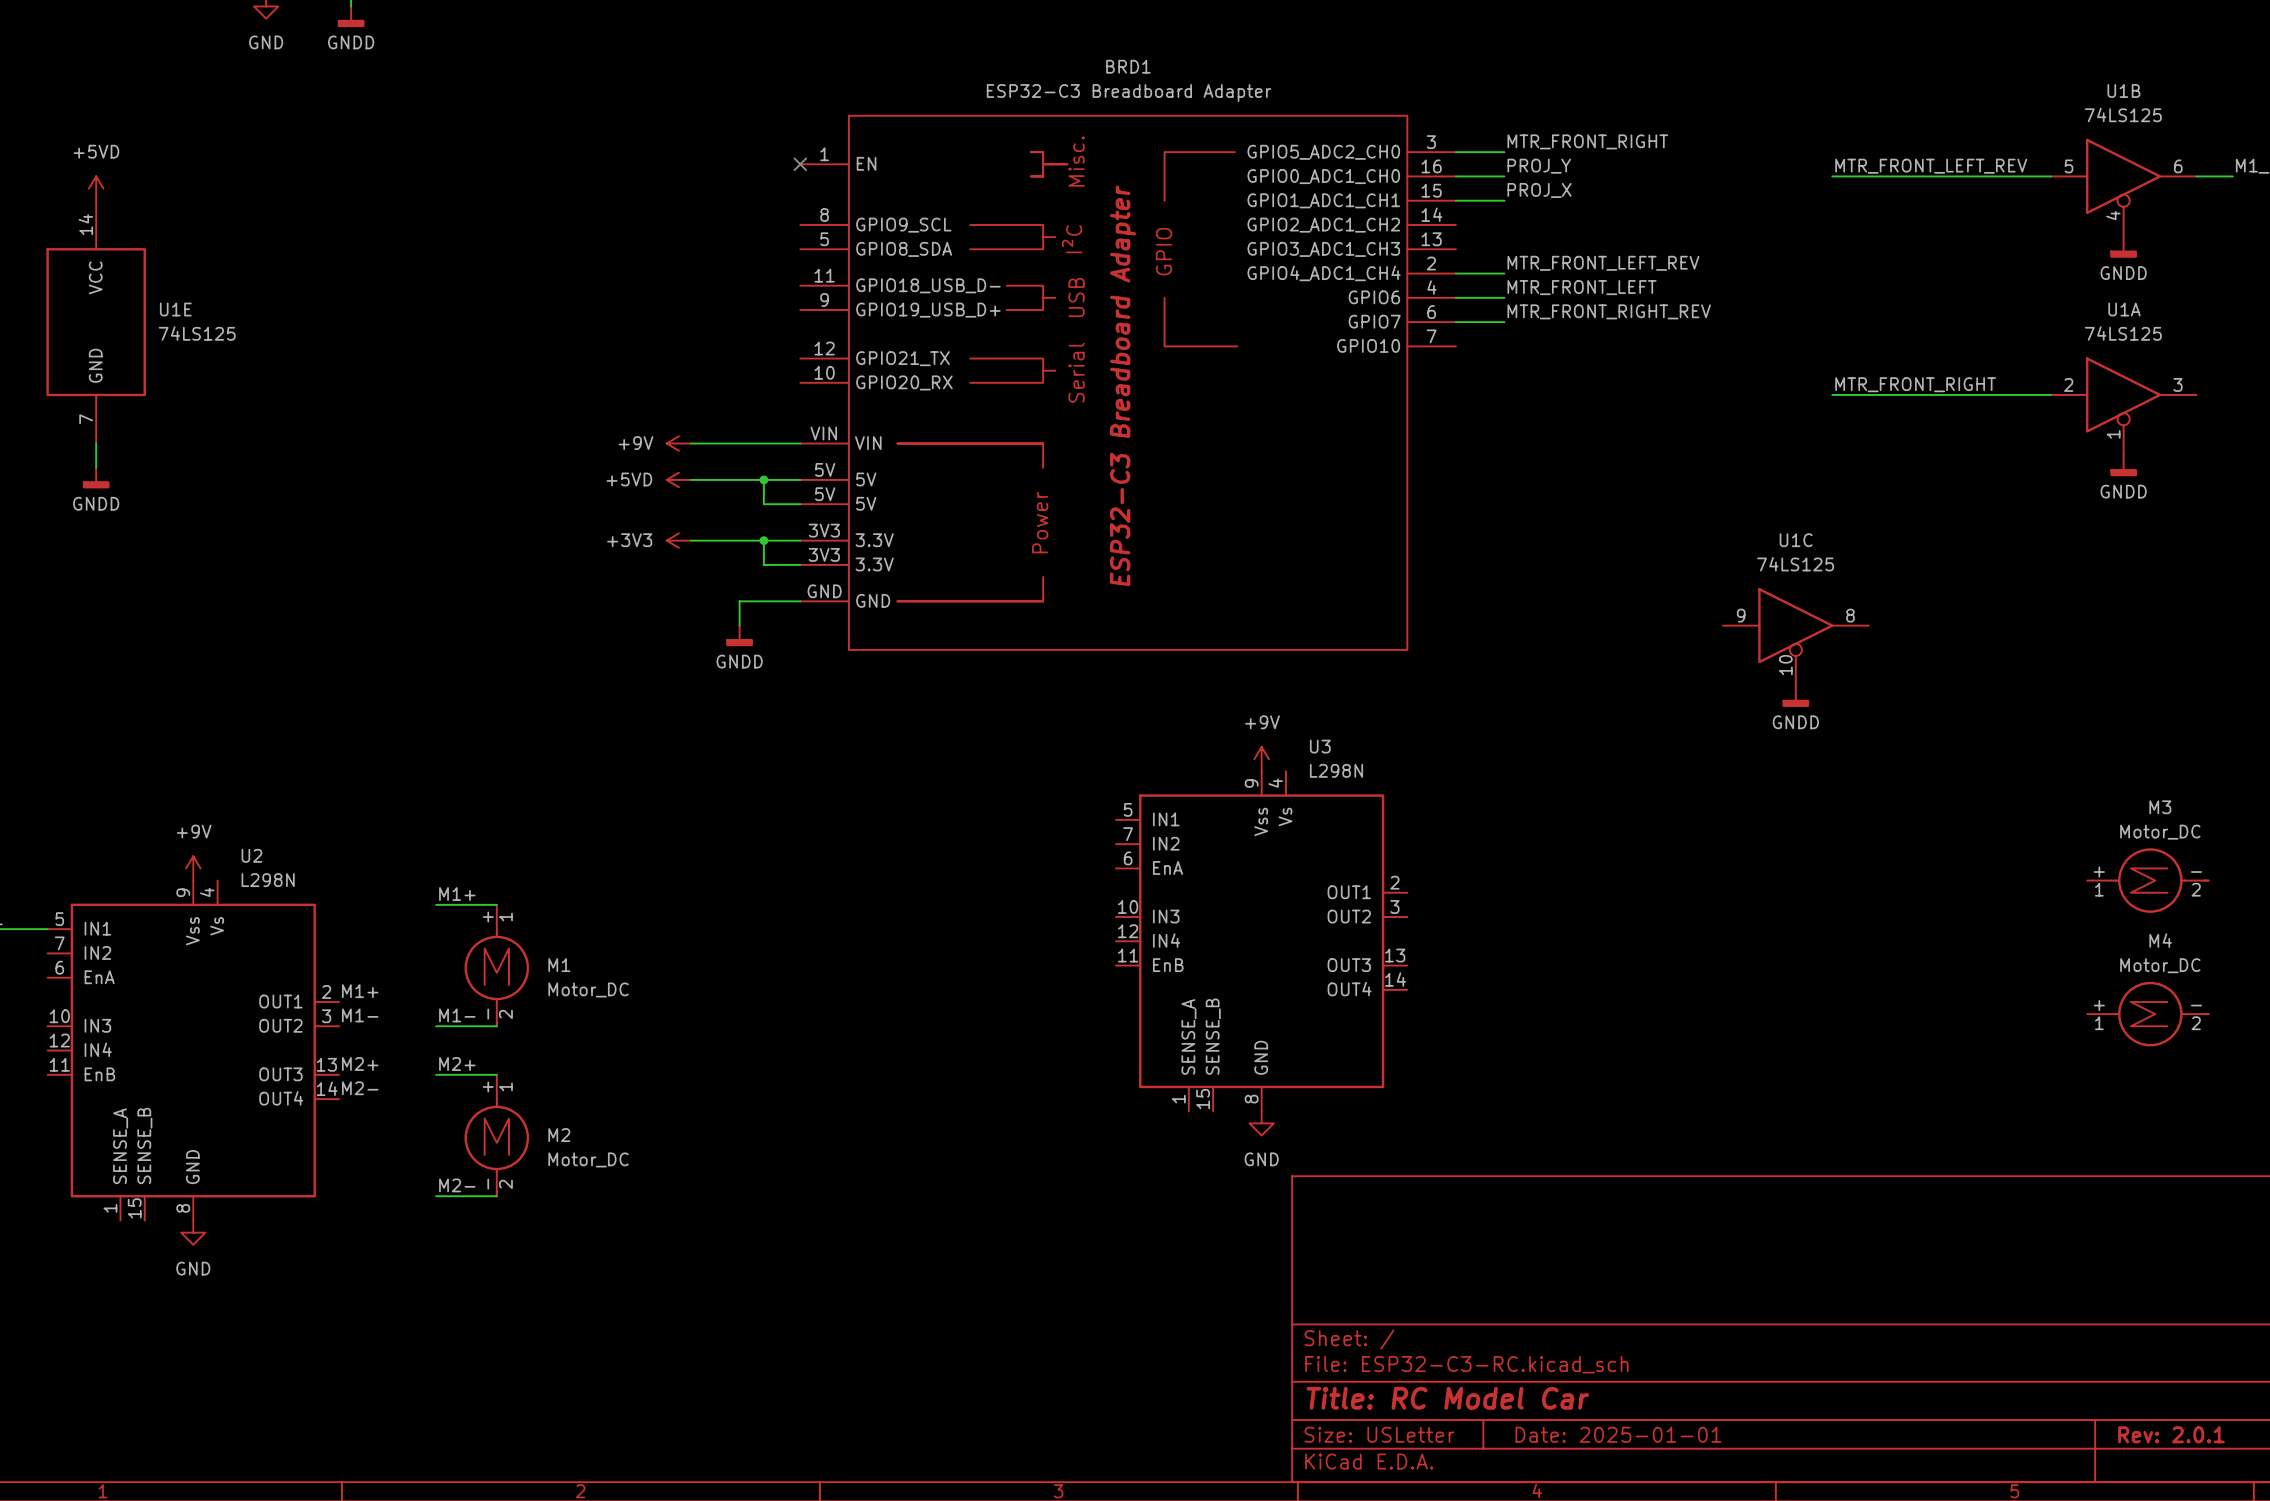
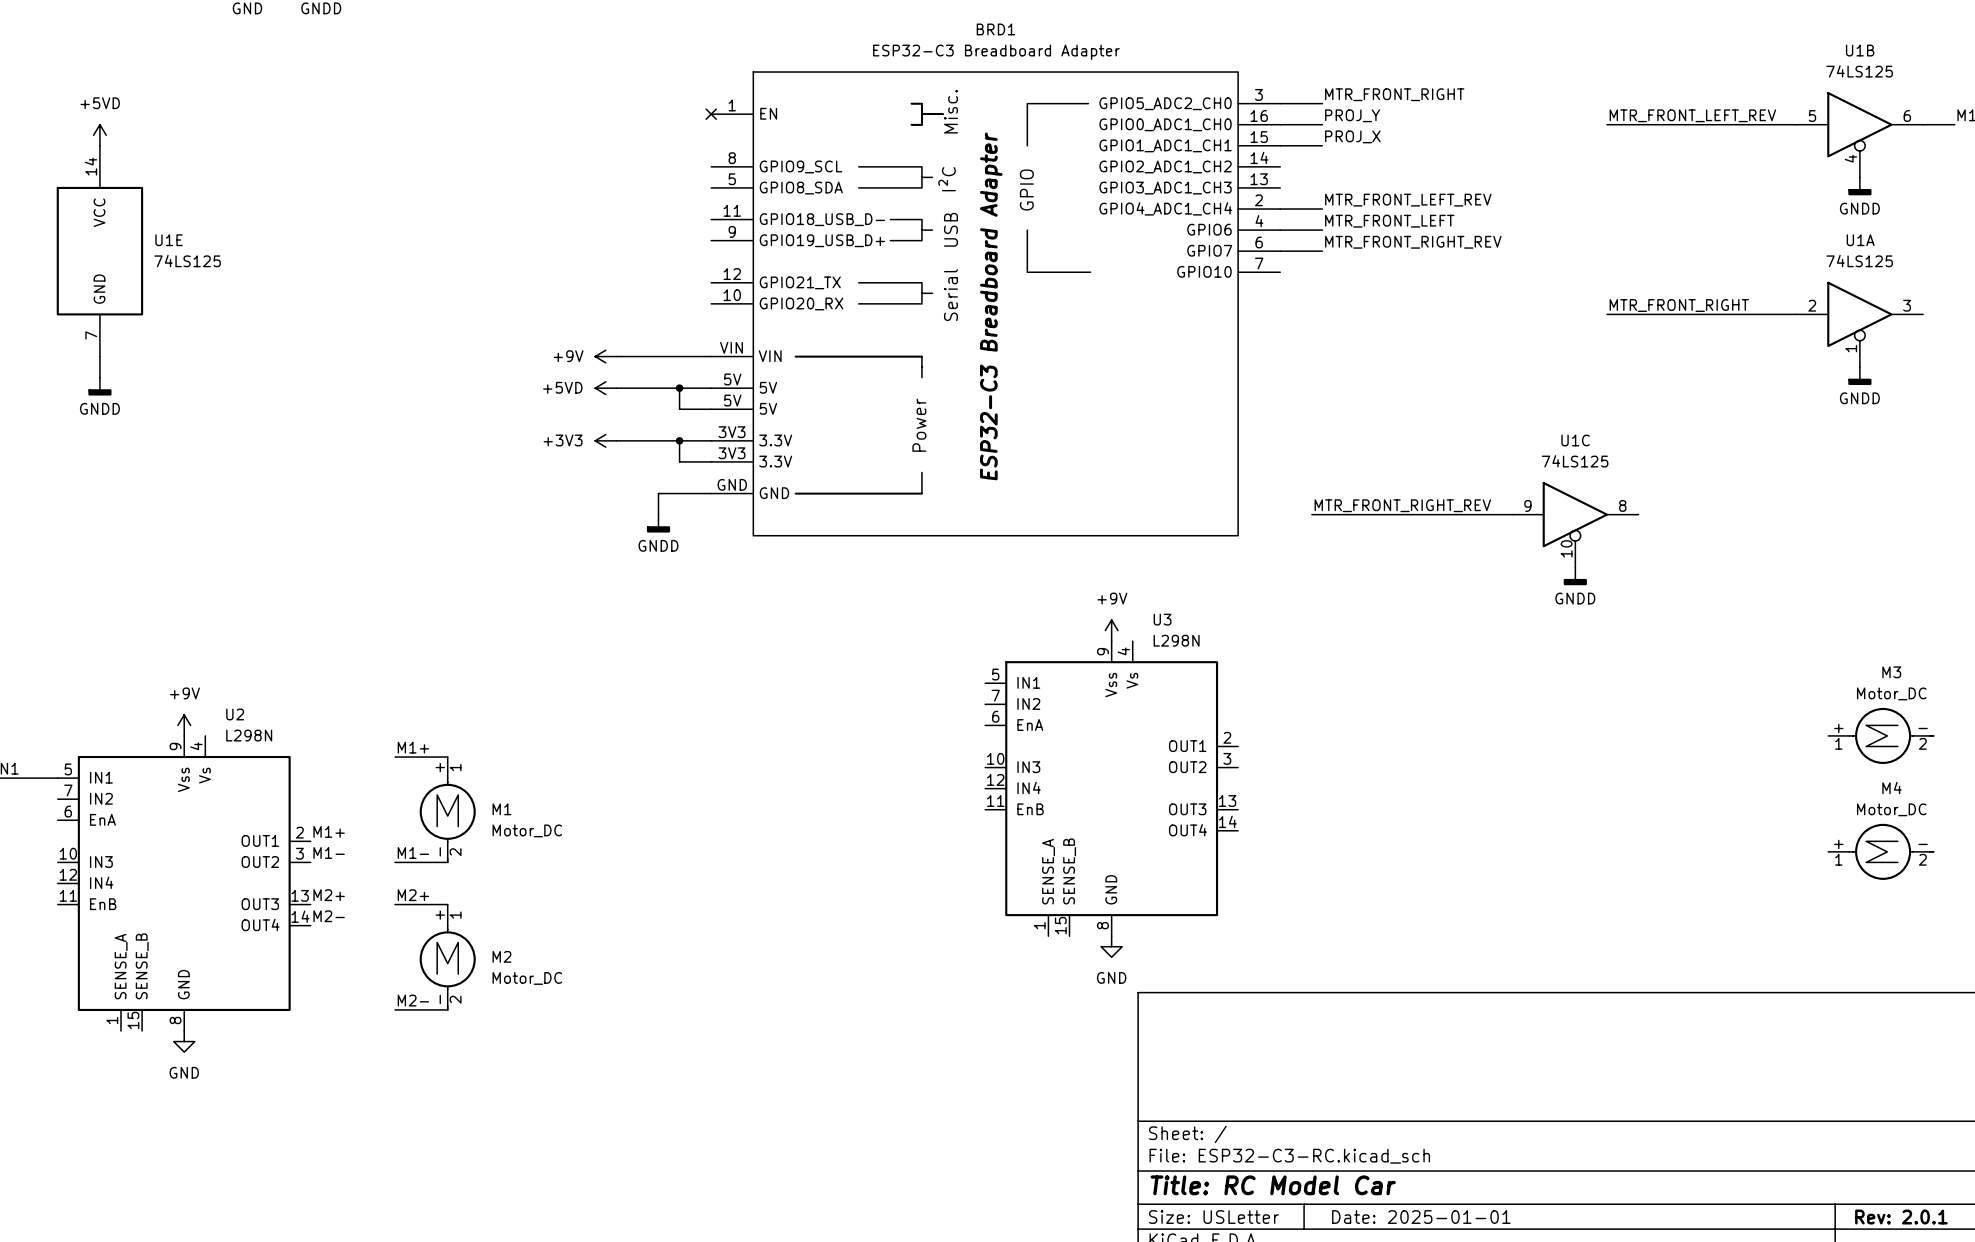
label: none -> MTR_FRONT_RIGHT_REV (1402, 505)
wire: none -> (1311, 514) (1512, 514)

